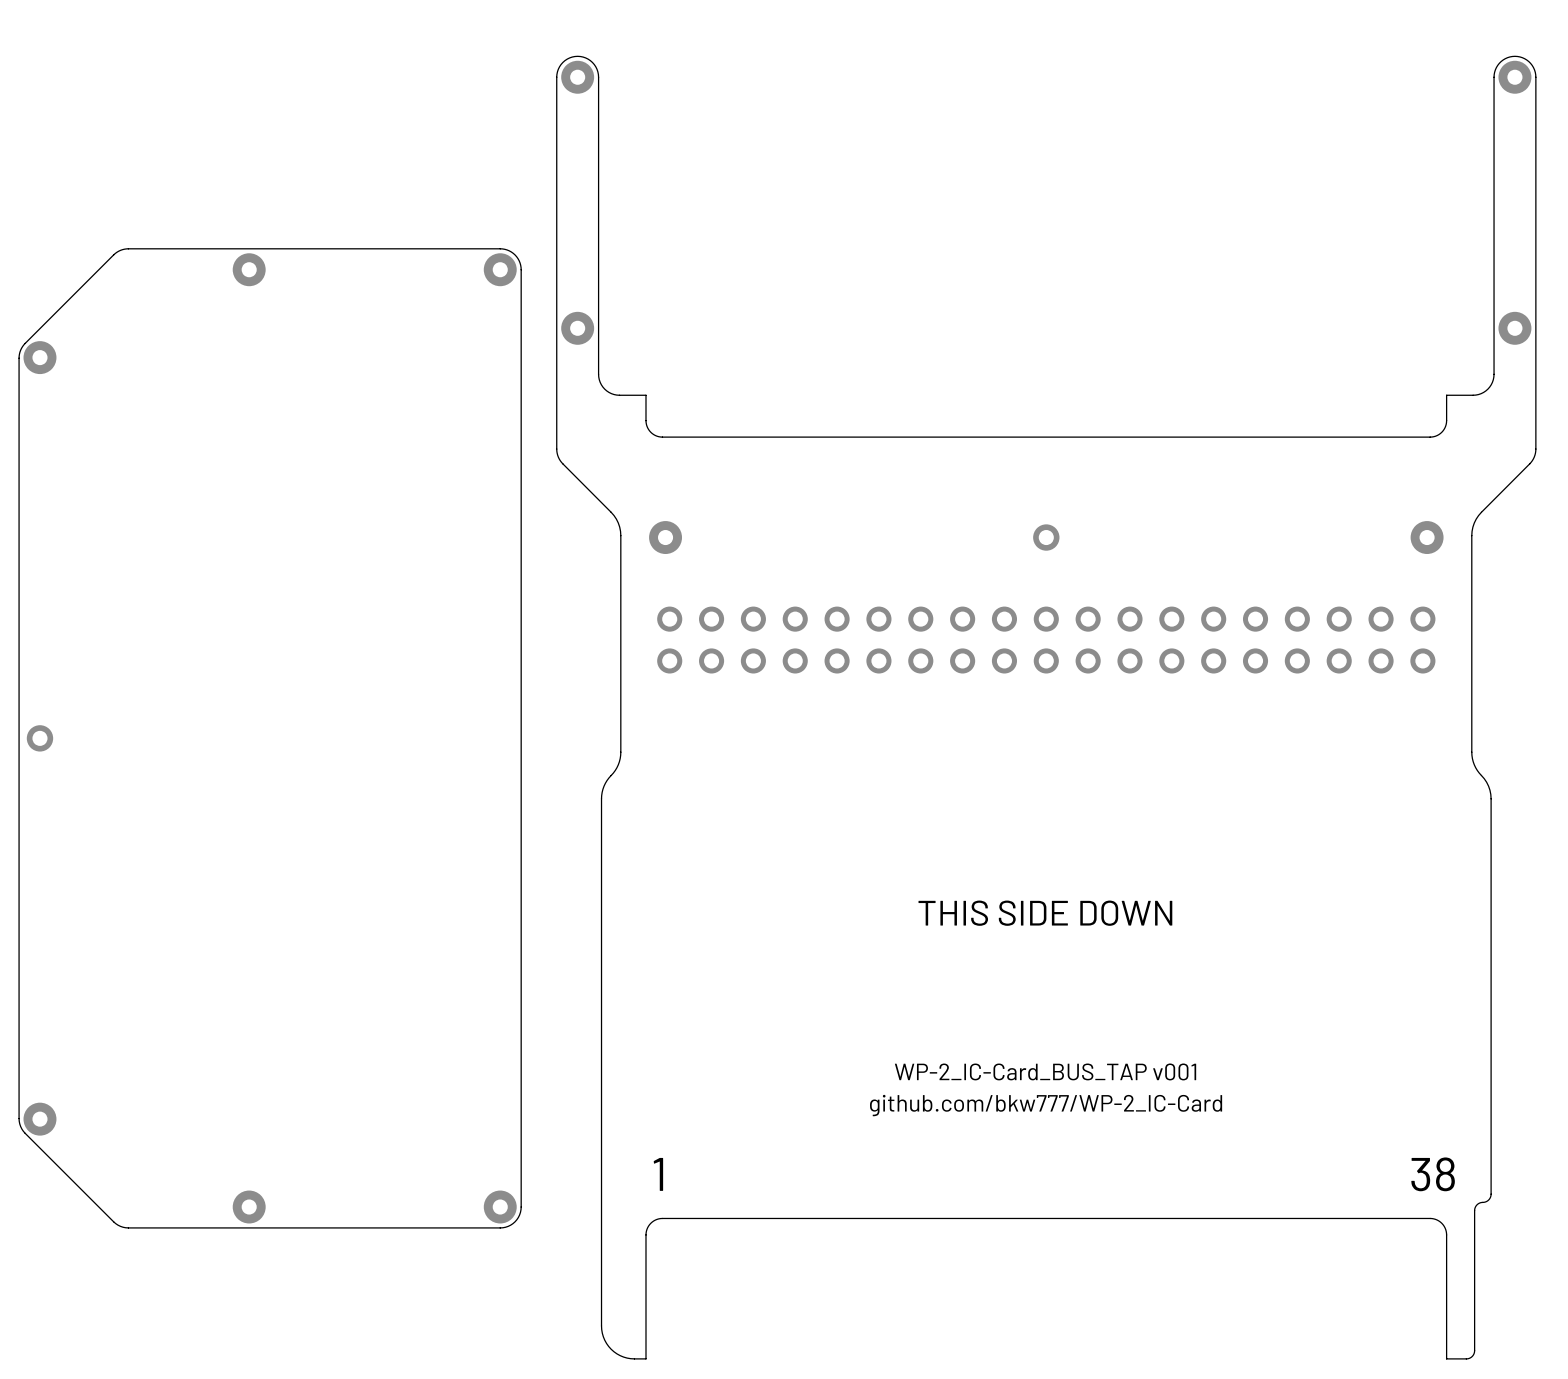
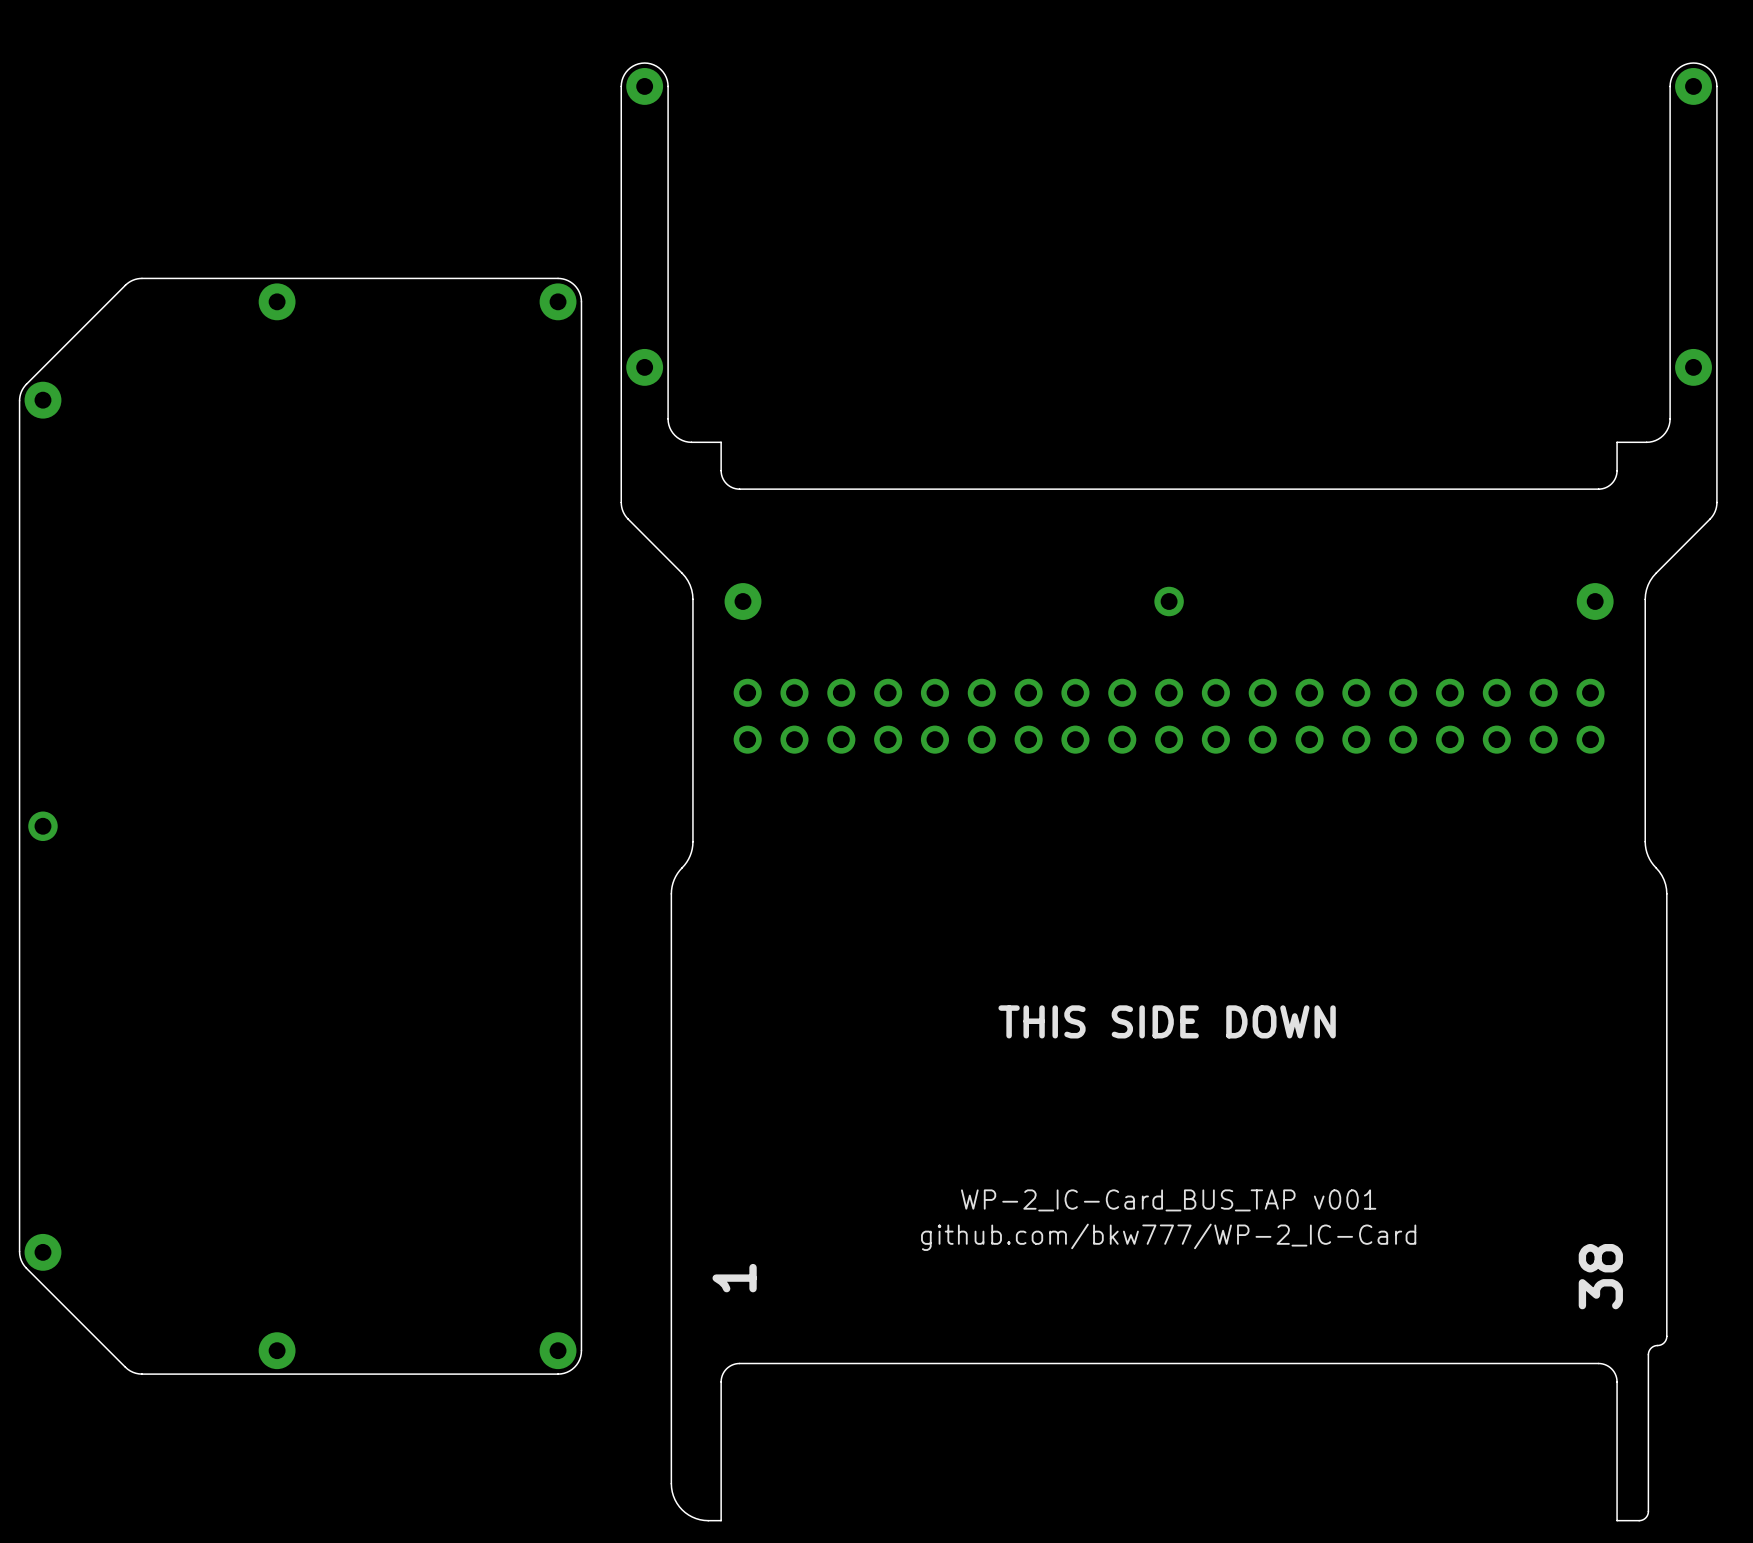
text rotation: 0° (658, 1174) -> 90° counterclockwise (734, 1278)
text rotation: 0° (1433, 1174) -> 90° counterclockwise (1600, 1276)

